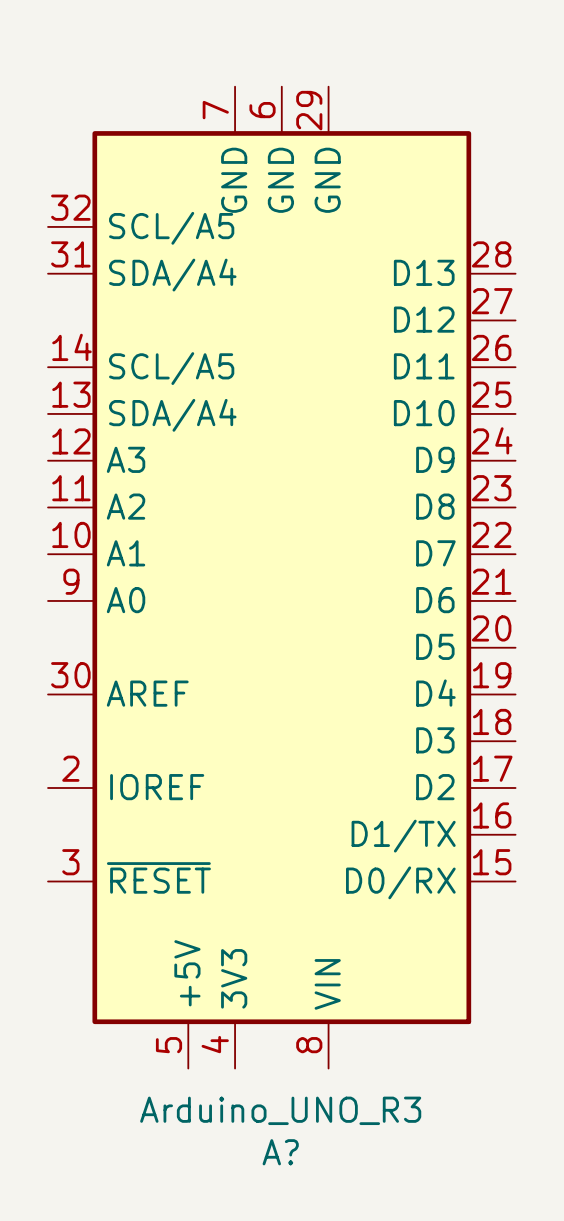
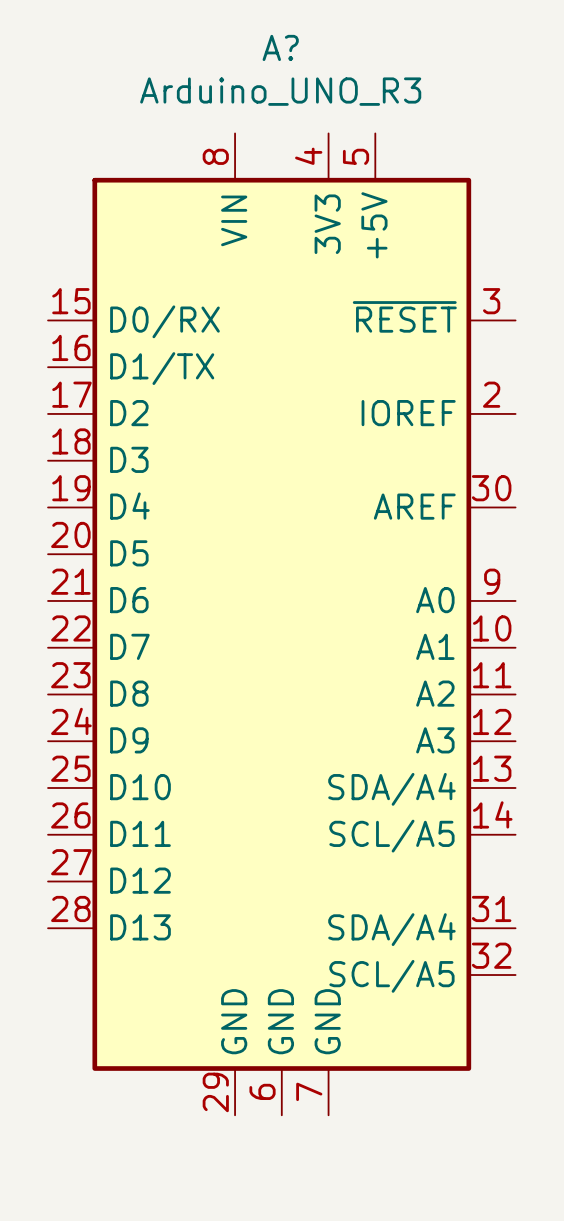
A? rotation: 0° (281, 577) -> 180° (281, 624)

